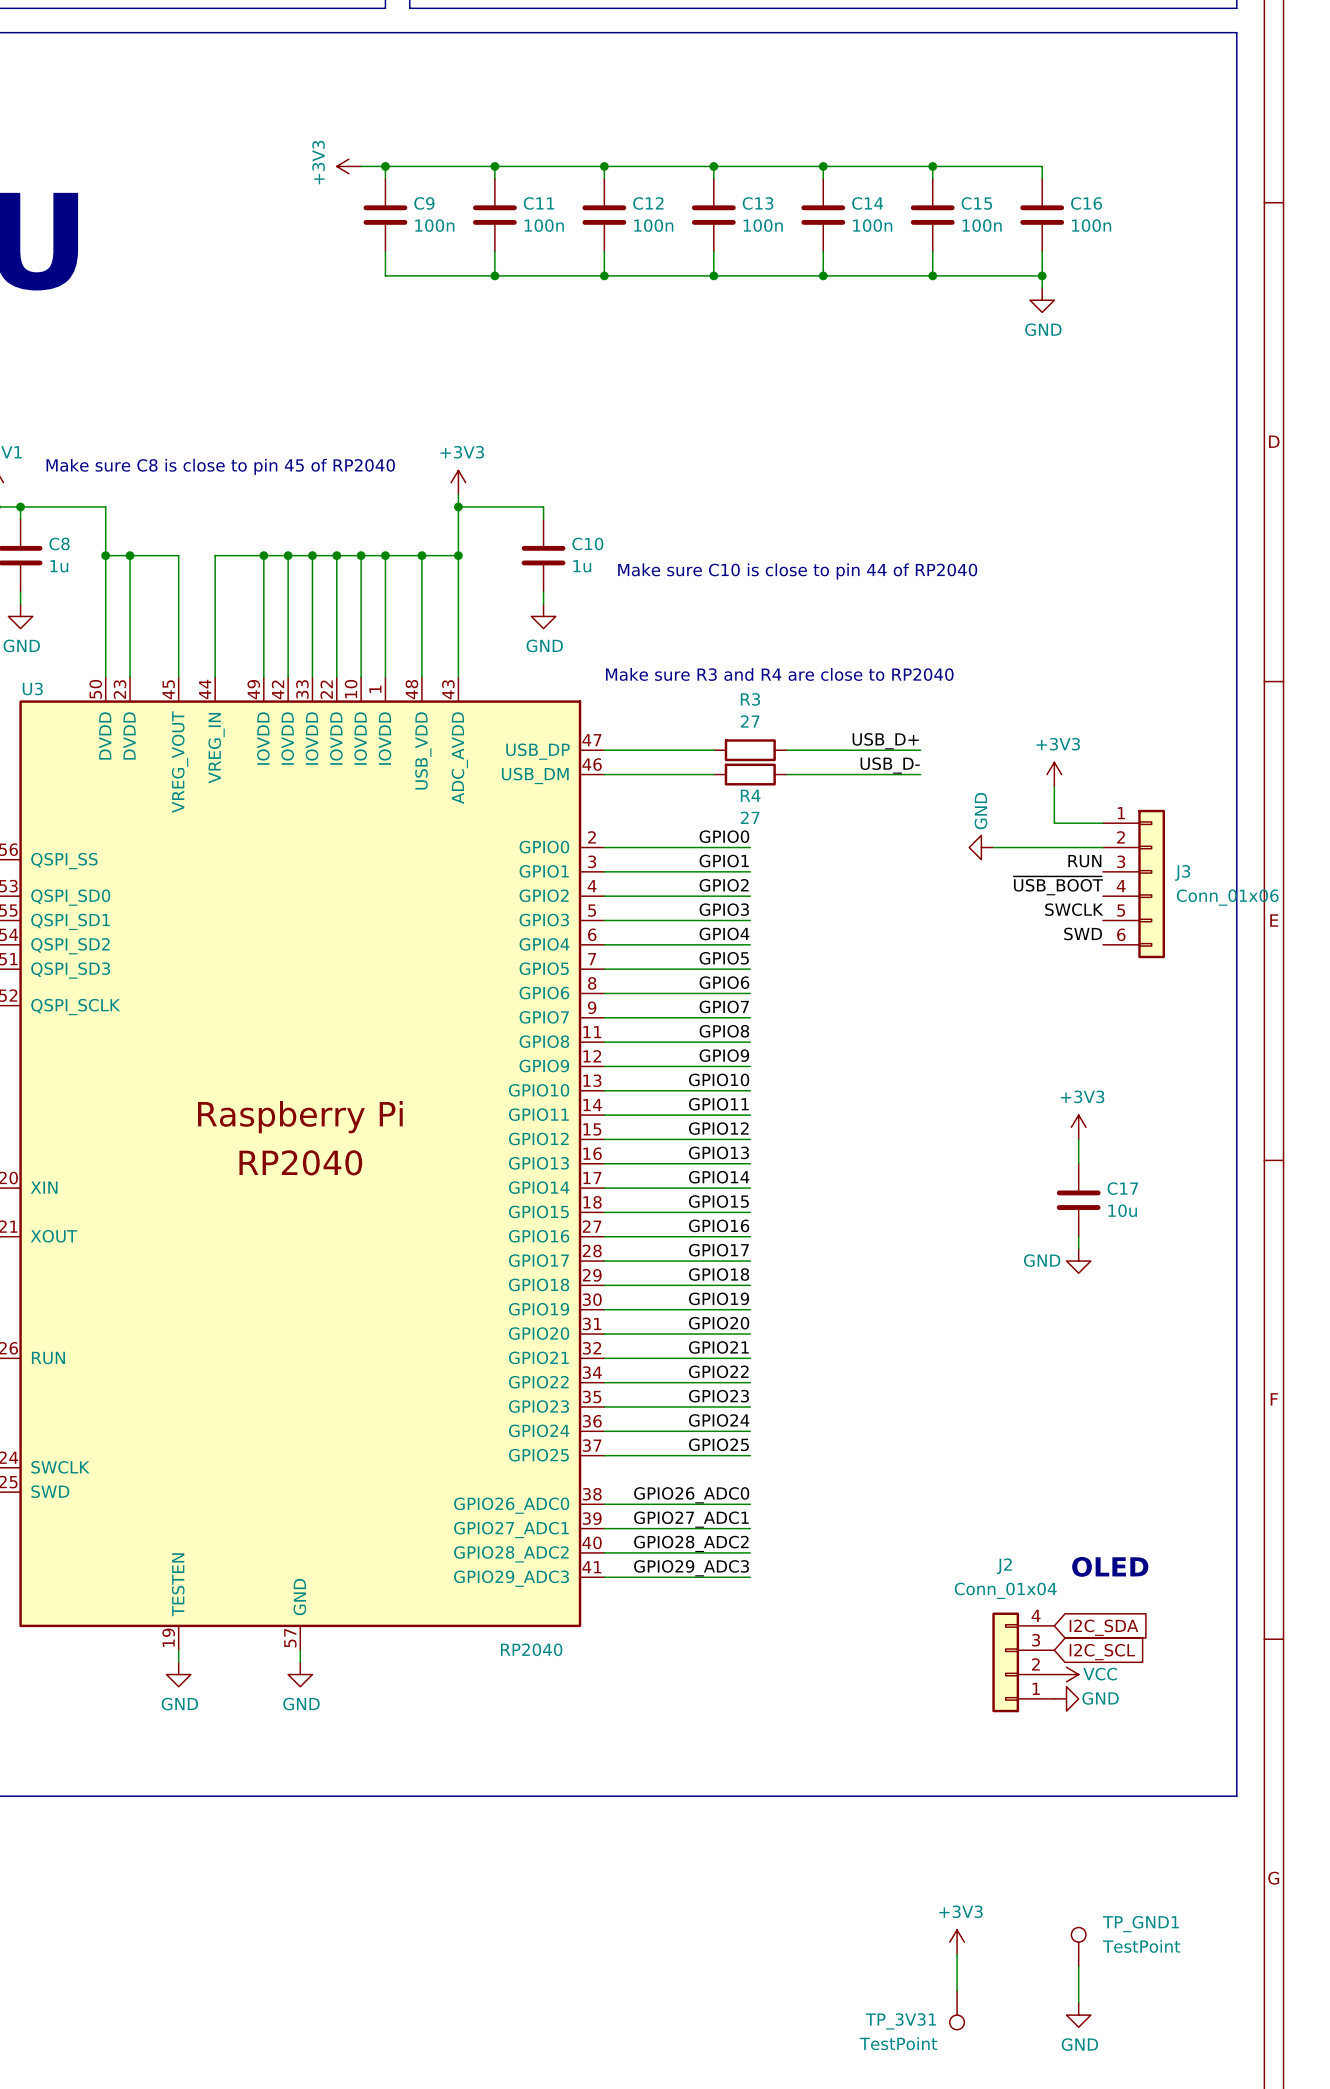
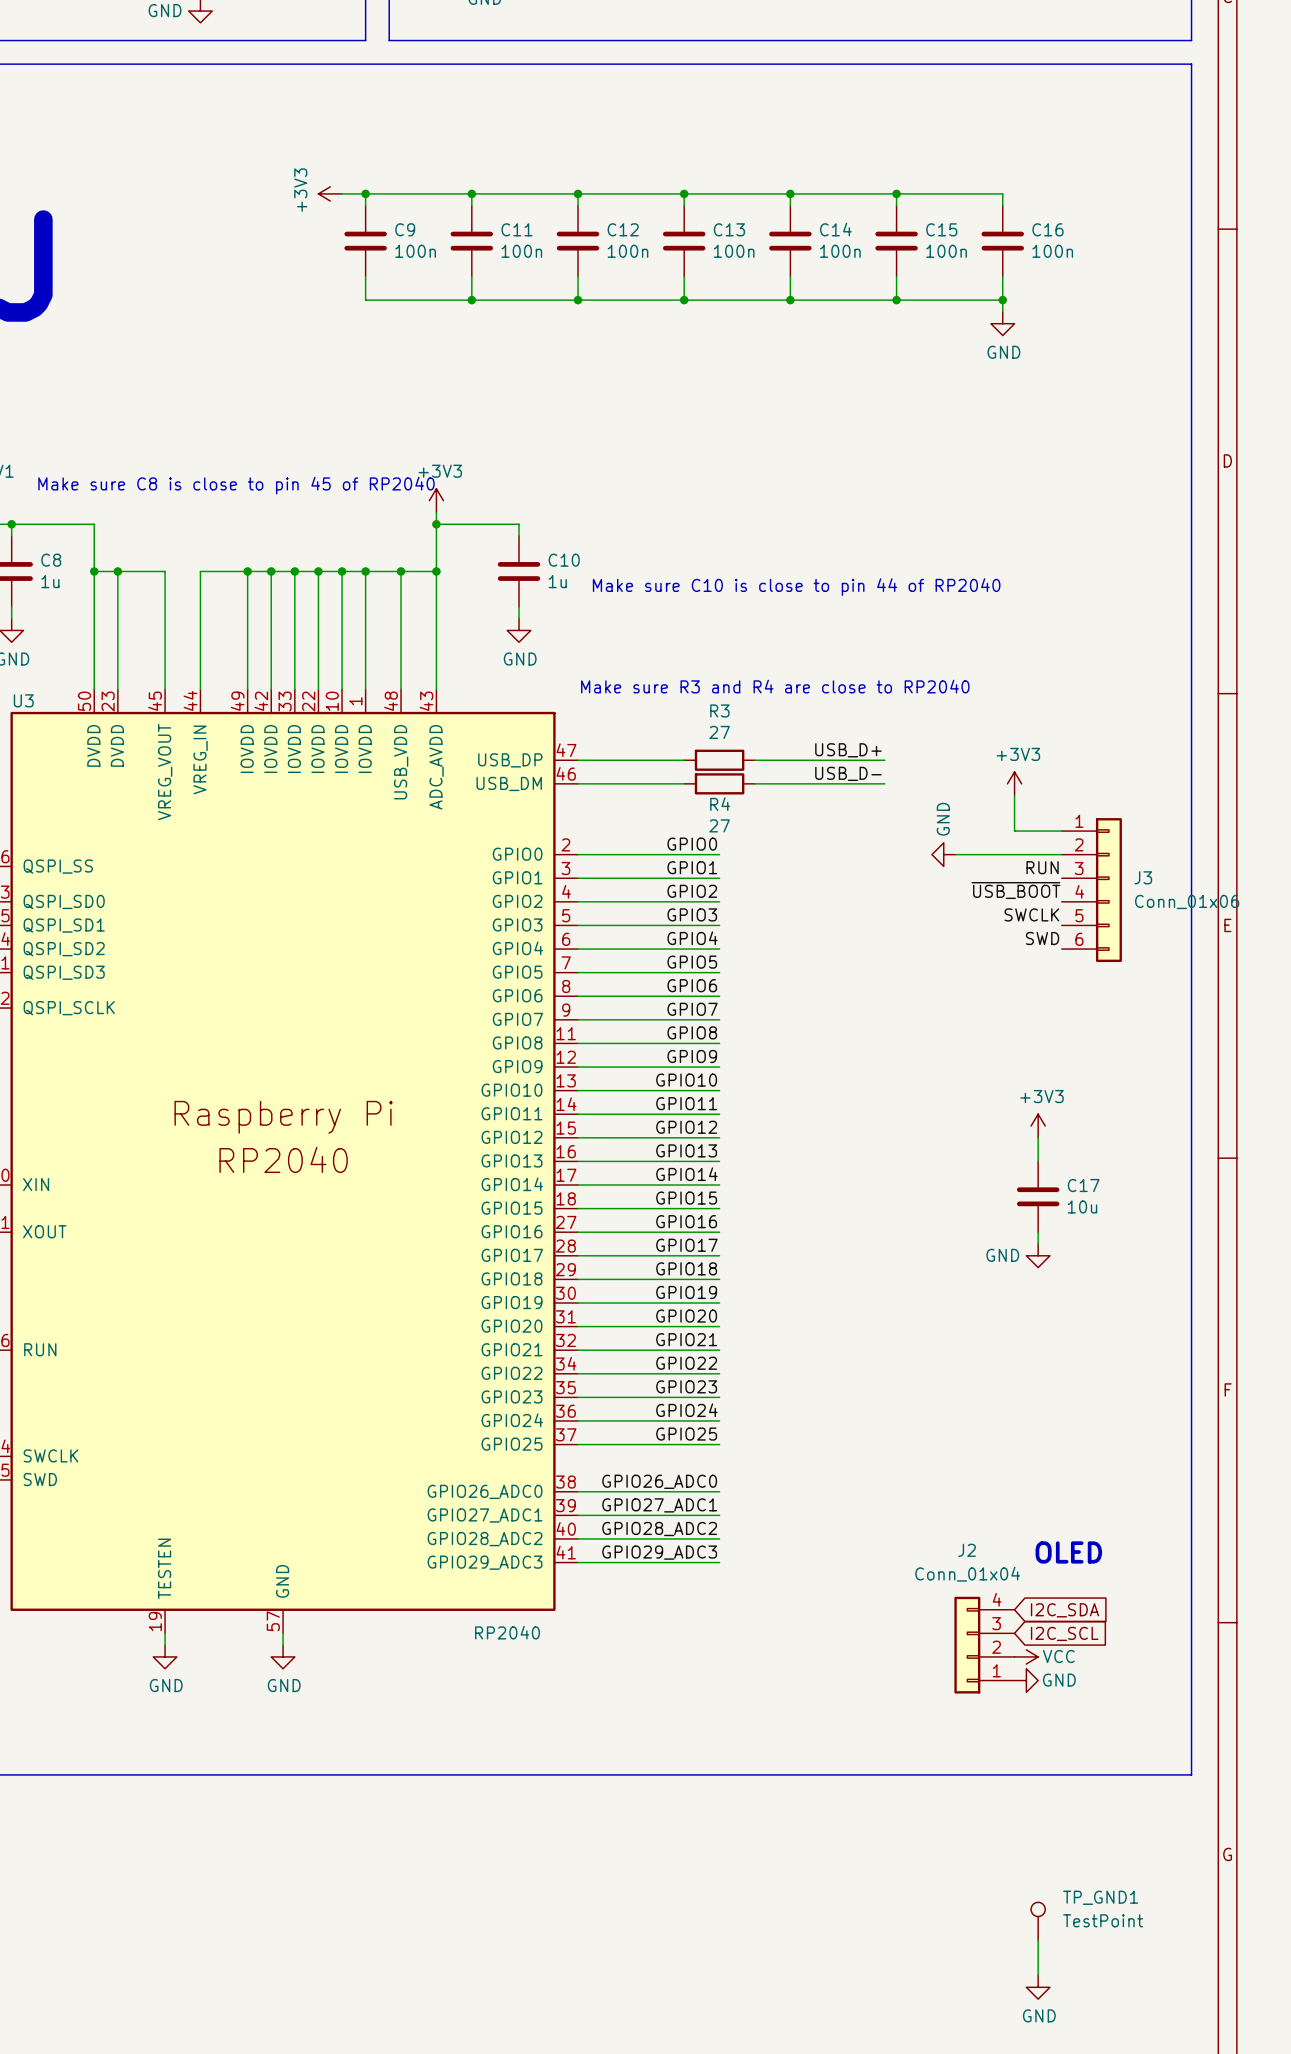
power symbol: +3V3 (957, 1942) -> none
wire: (957, 1954) (957, 1990) -> none
TP_3V31: TestPoint (957, 2010) -> none

